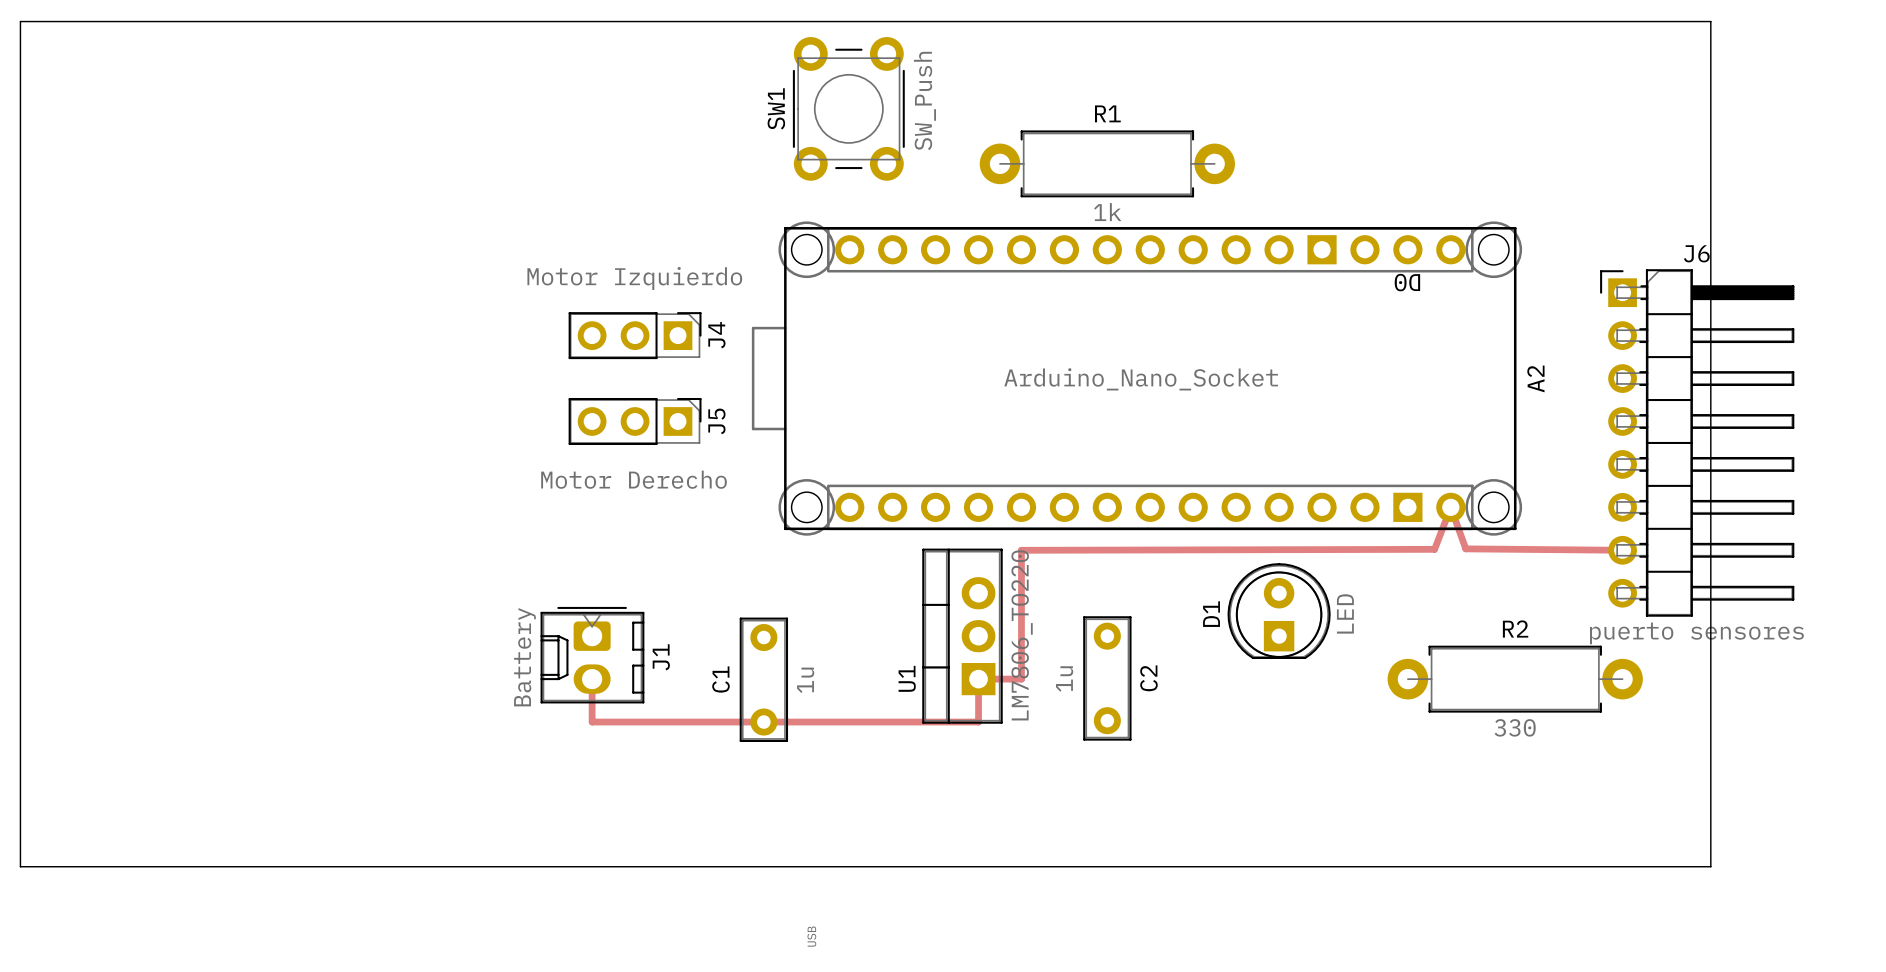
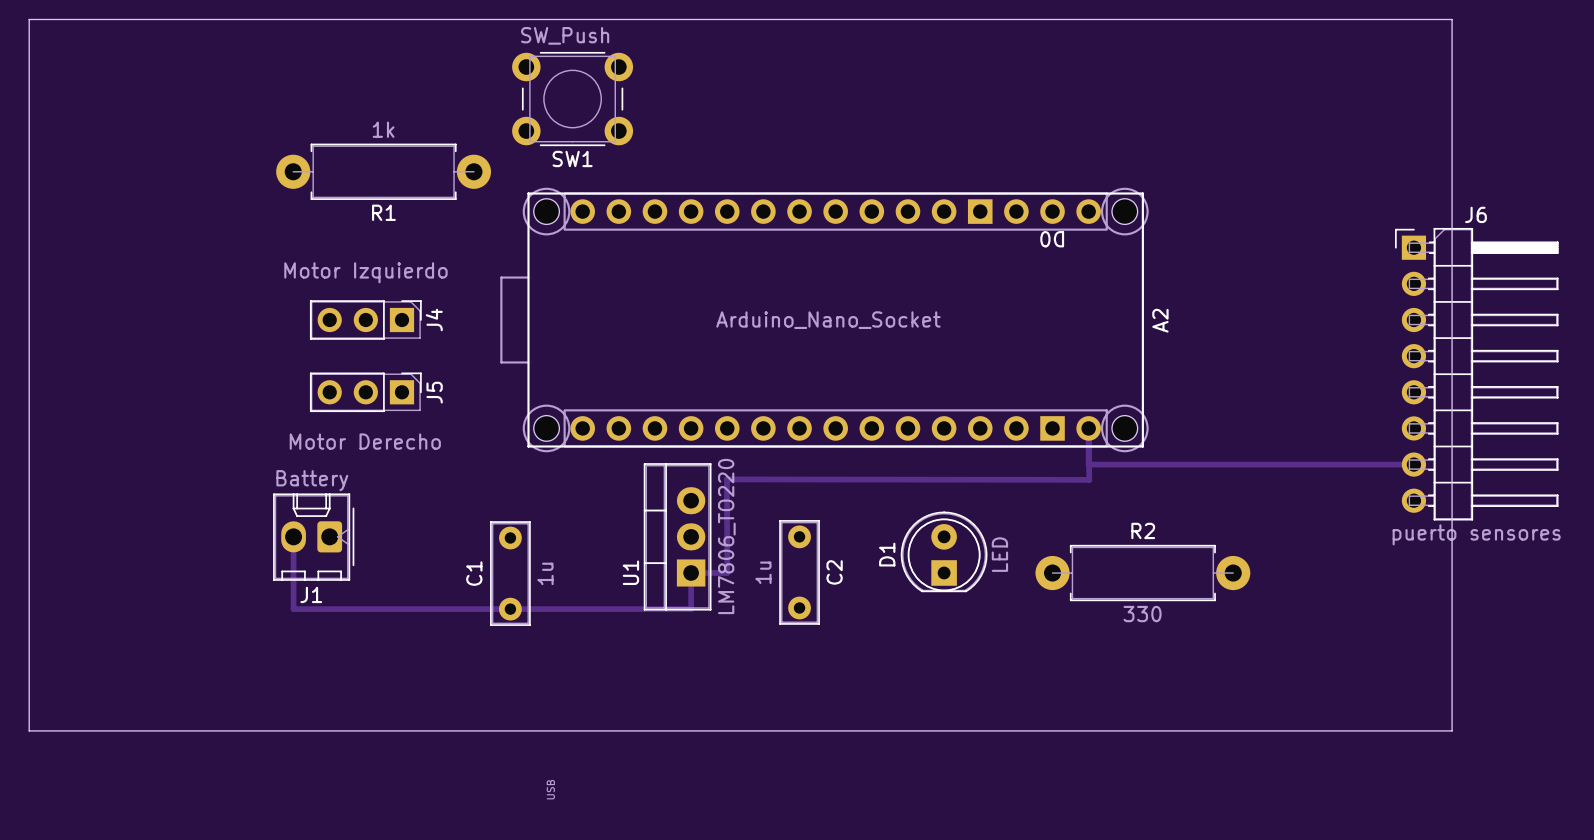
SW1 rotation: 0° (848, 108) -> 90° counterclockwise (572, 99)
SW1 position: (848, 108) -> (572, 99)
R1 name position: R1 (1107, 113) -> R1 (383, 212)
R1 position: (1107, 163) -> (383, 171)
R1 value position: 1k (1107, 212) -> 1k (383, 129)
J4 position: (635, 335) -> (365, 320)
A2 position: (1136, 378) -> (824, 320)
J5 position: (635, 421) -> (365, 392)
J6 position: (1697, 442) -> (1476, 374)
track: (1622, 550) (1465, 548) (1450, 507) (1434, 549) (1021, 550) (1021, 679) (978, 679) (978, 722) (806, 722) -> (1413, 464) (1088, 464) (1088, 428) (1089, 479) (726, 479) (727, 572) (691, 572) (691, 609)
D1 position: (1279, 611) -> (944, 551)
U1 position: (962, 636) -> (677, 536)
J1 rotation: 0° (592, 655) -> 90° clockwise (313, 537)
J1 position: (592, 655) -> (313, 537)
C2 position: (1107, 678) -> (799, 572)
track: (592, 679) (592, 722) -> (293, 536) (293, 609) (510, 609)
C1 position: (763, 679) -> (510, 573)
R2 position: (1515, 679) -> (1142, 573)

